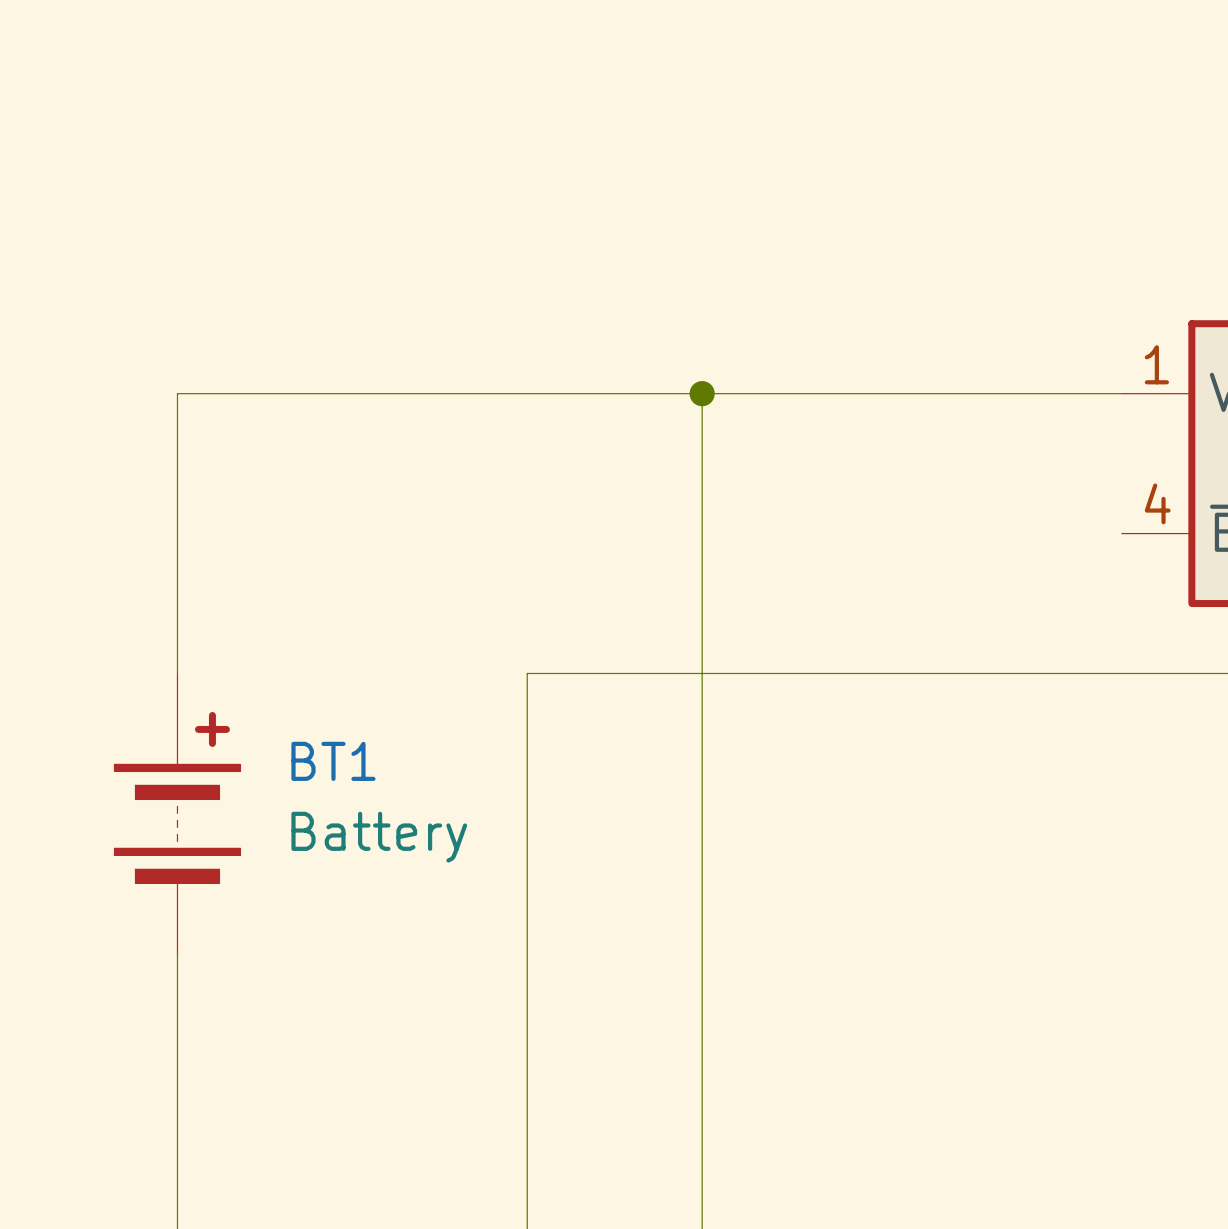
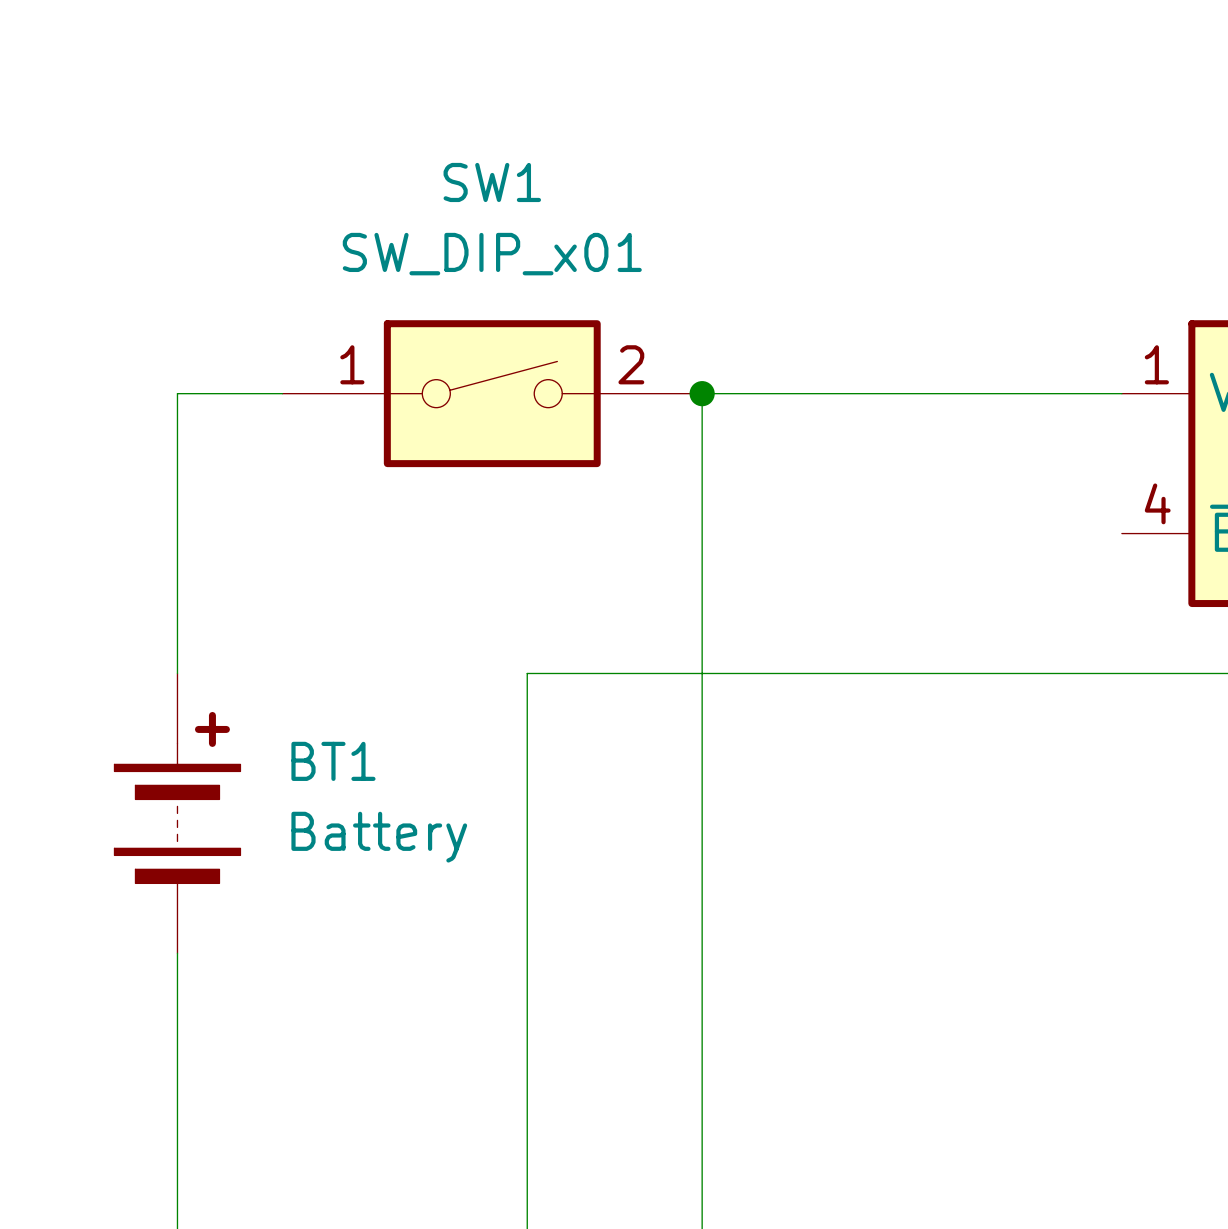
SW1: none -> SW_DIP_x01 (492, 393)

